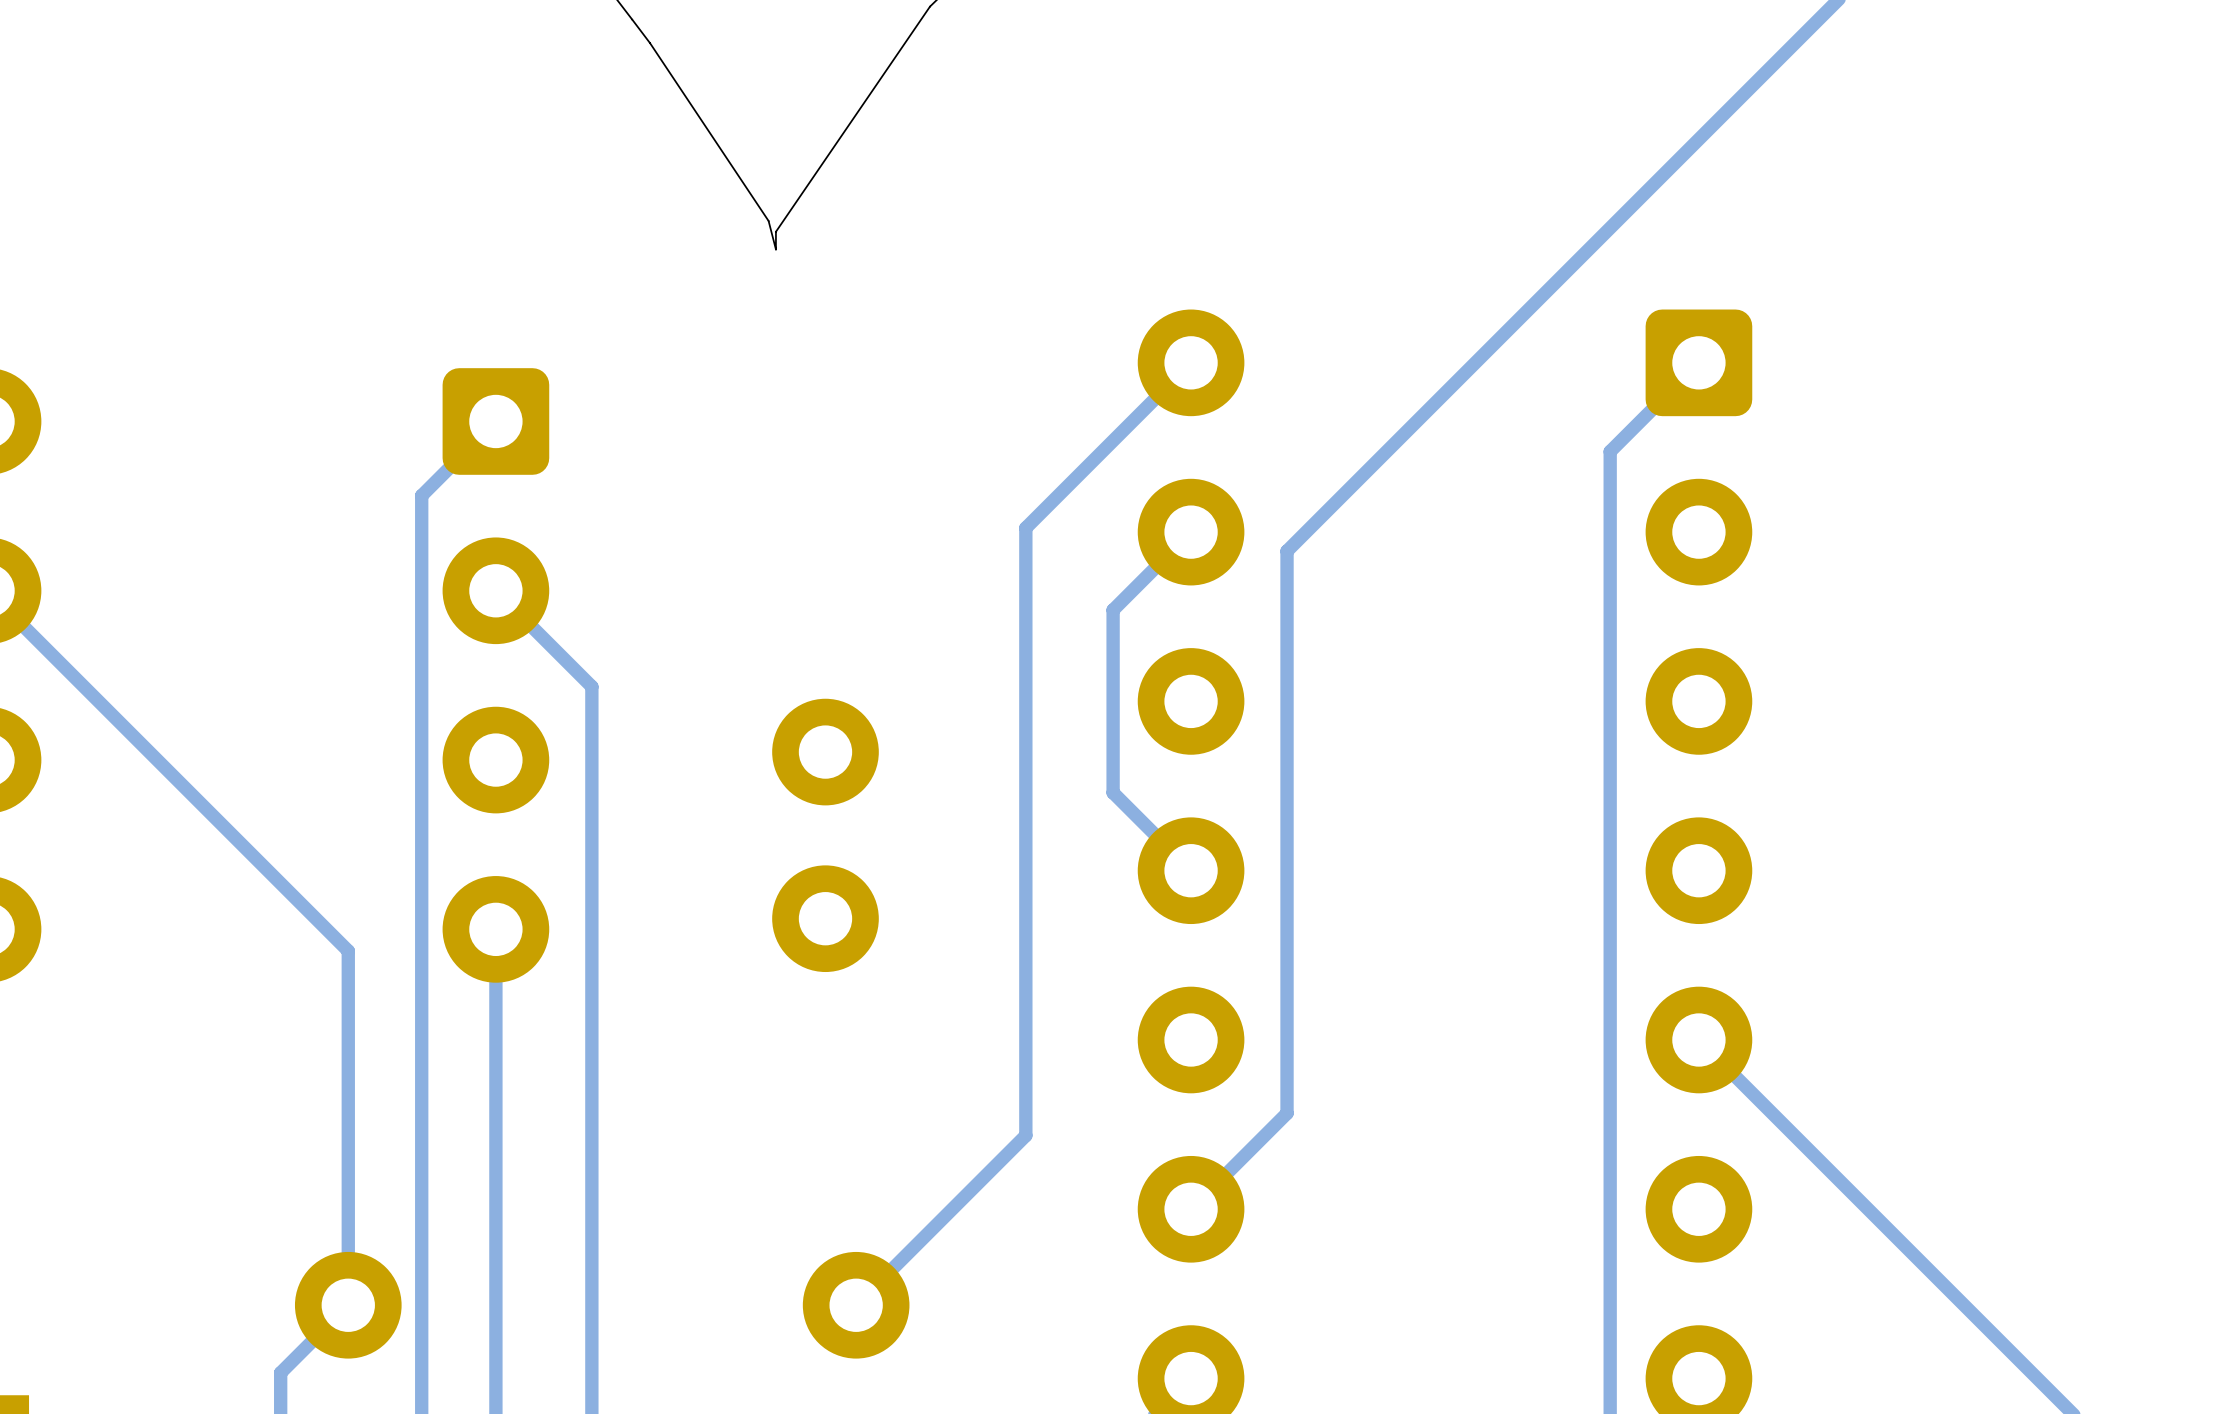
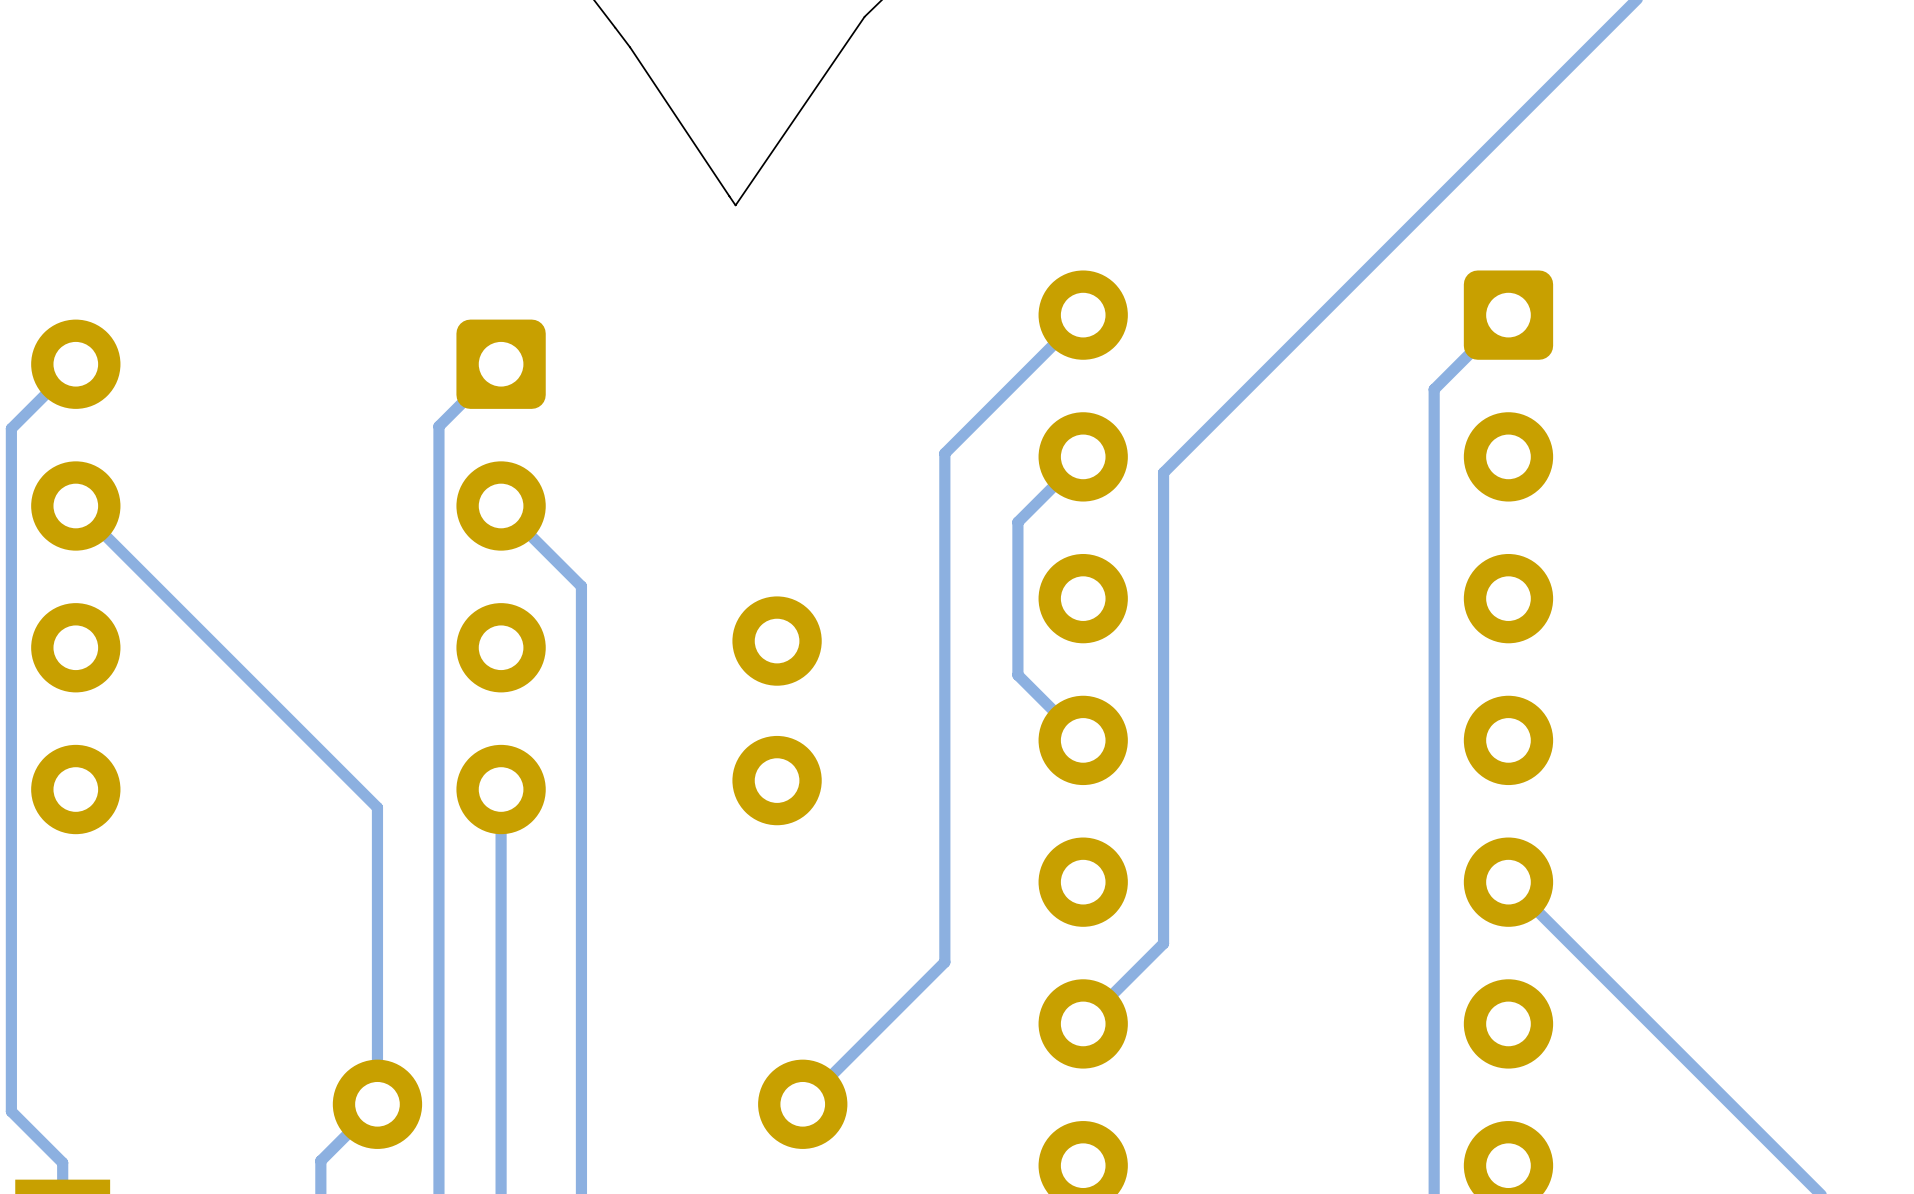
board edge: (768, 220) (775, 249) (775, 231) -> (729, 196) (735, 205)

